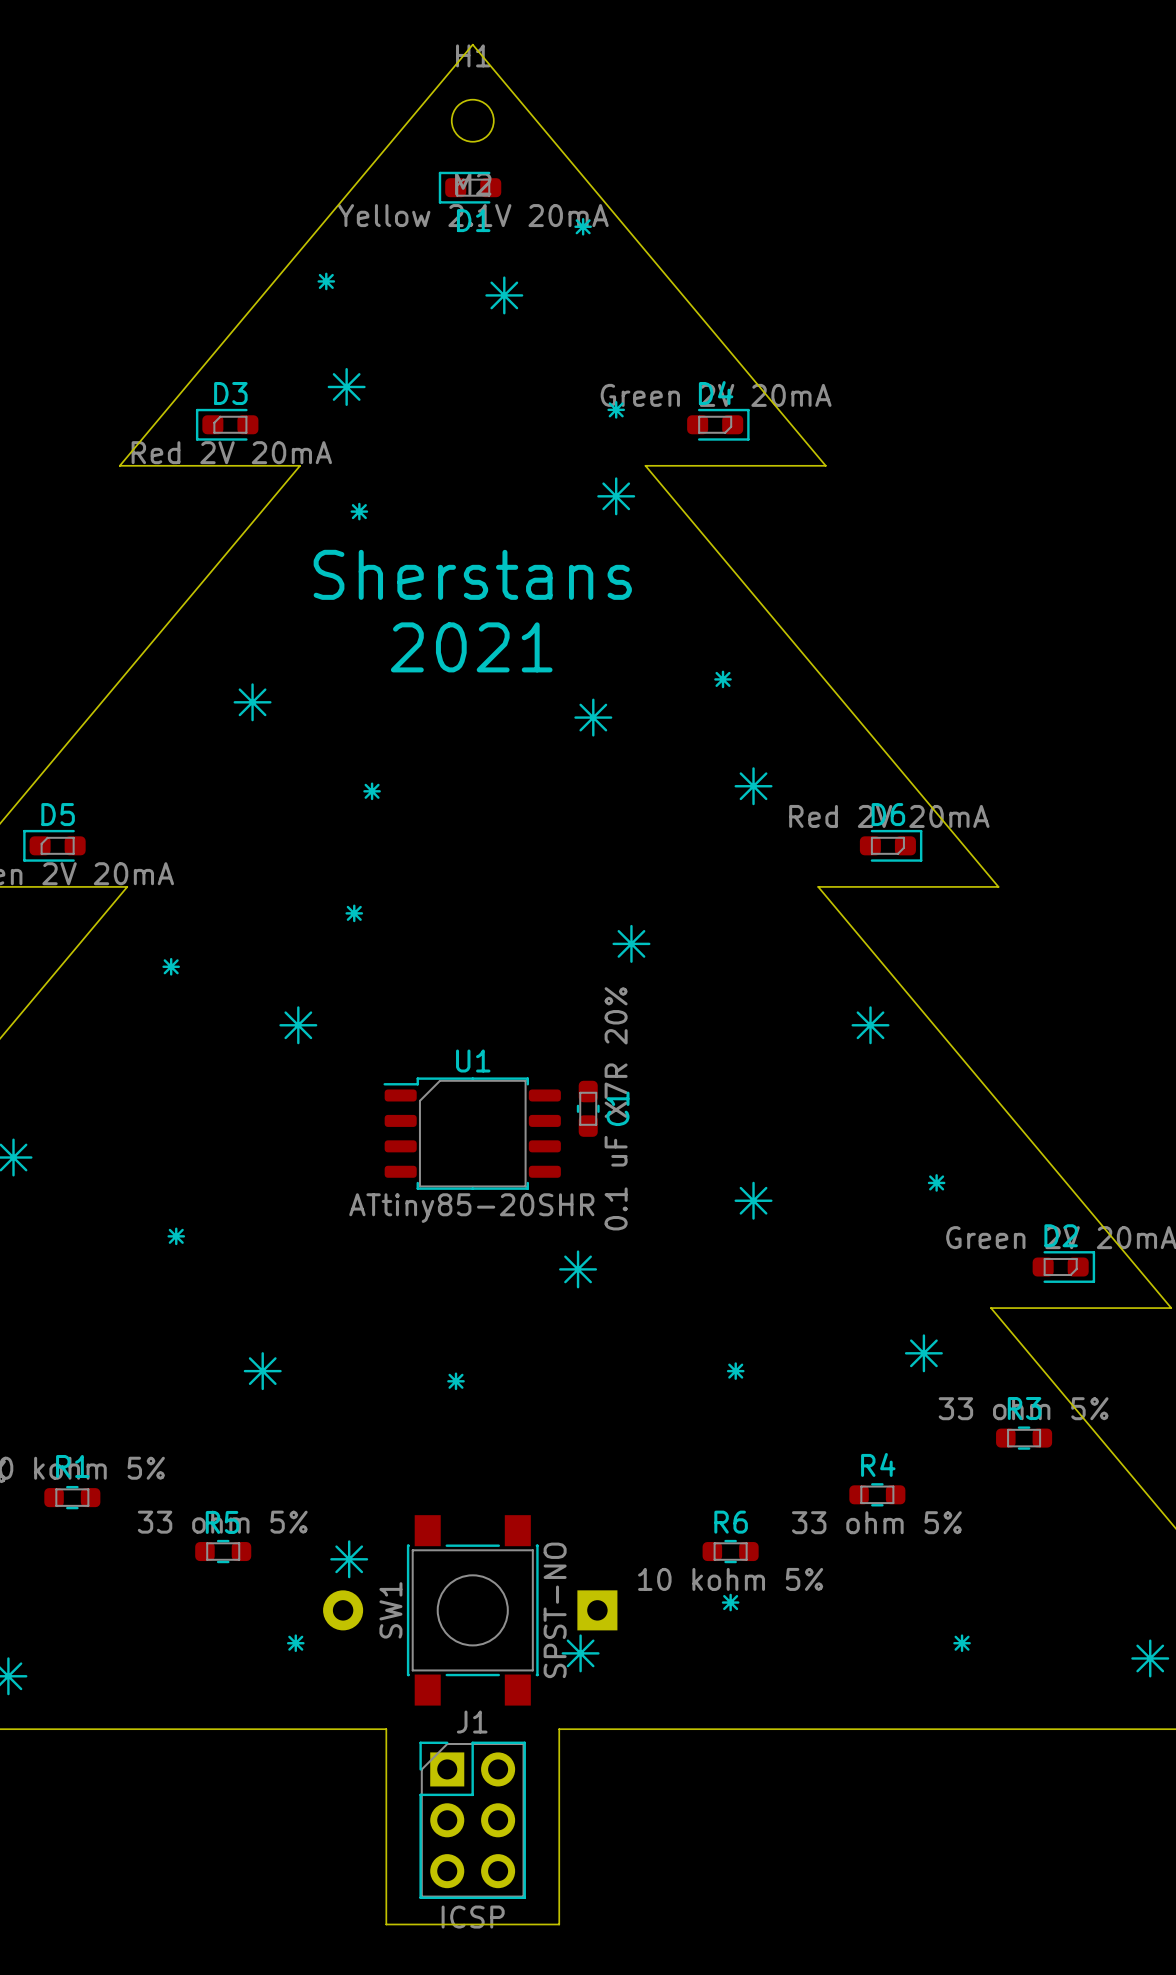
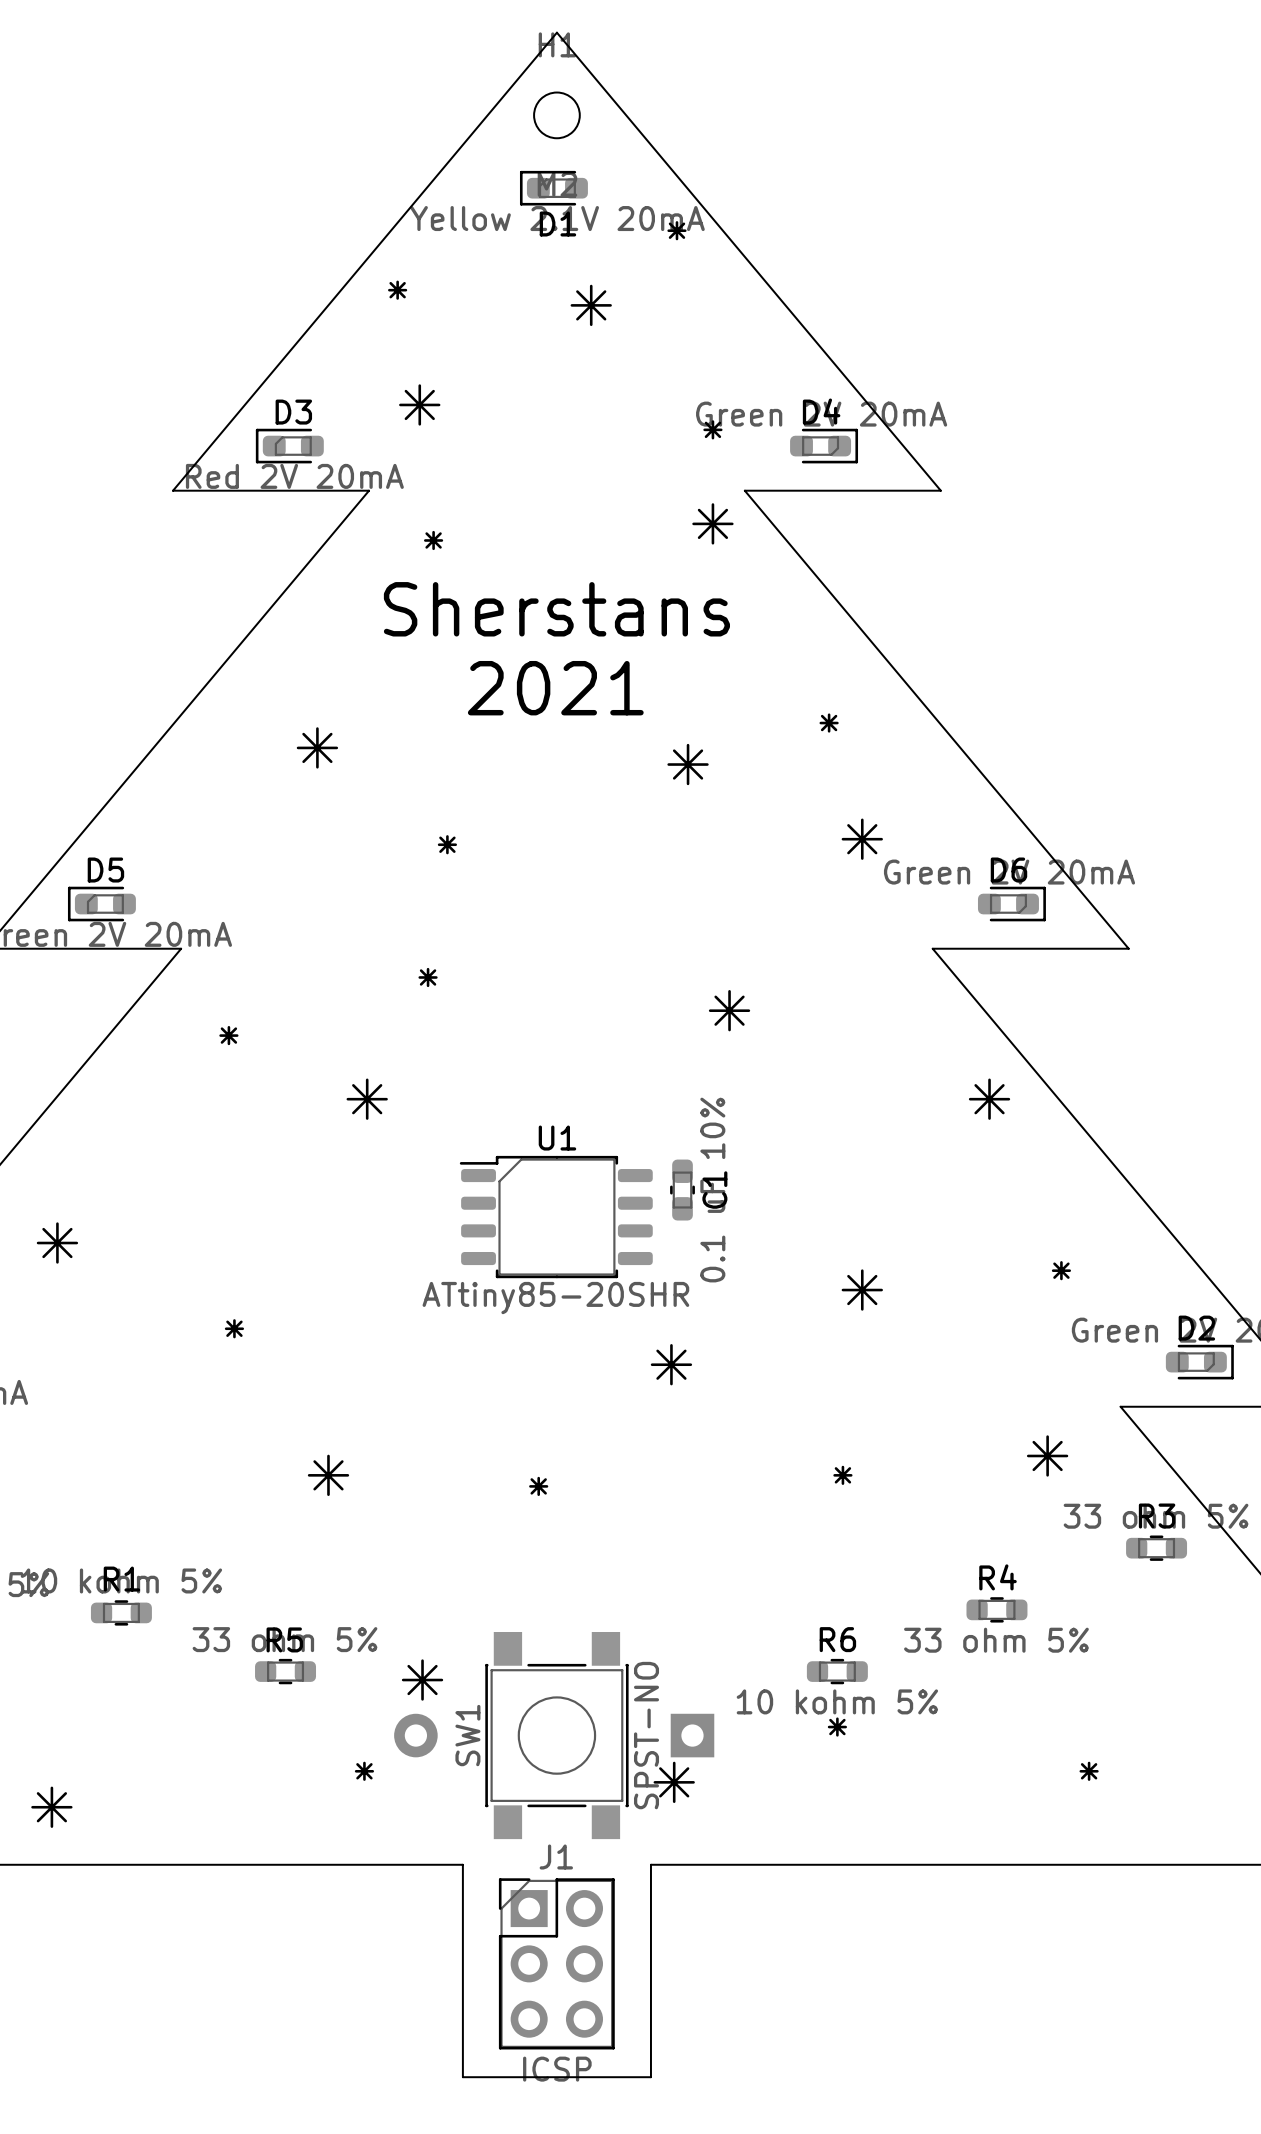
D6 value: Red 2V 20mA (889, 816) -> Green 2V 20mA (1009, 872)
C1 value: 0.1 uF X7R 20% (616, 1108) -> 0.1 uF 10% (712, 1190)

